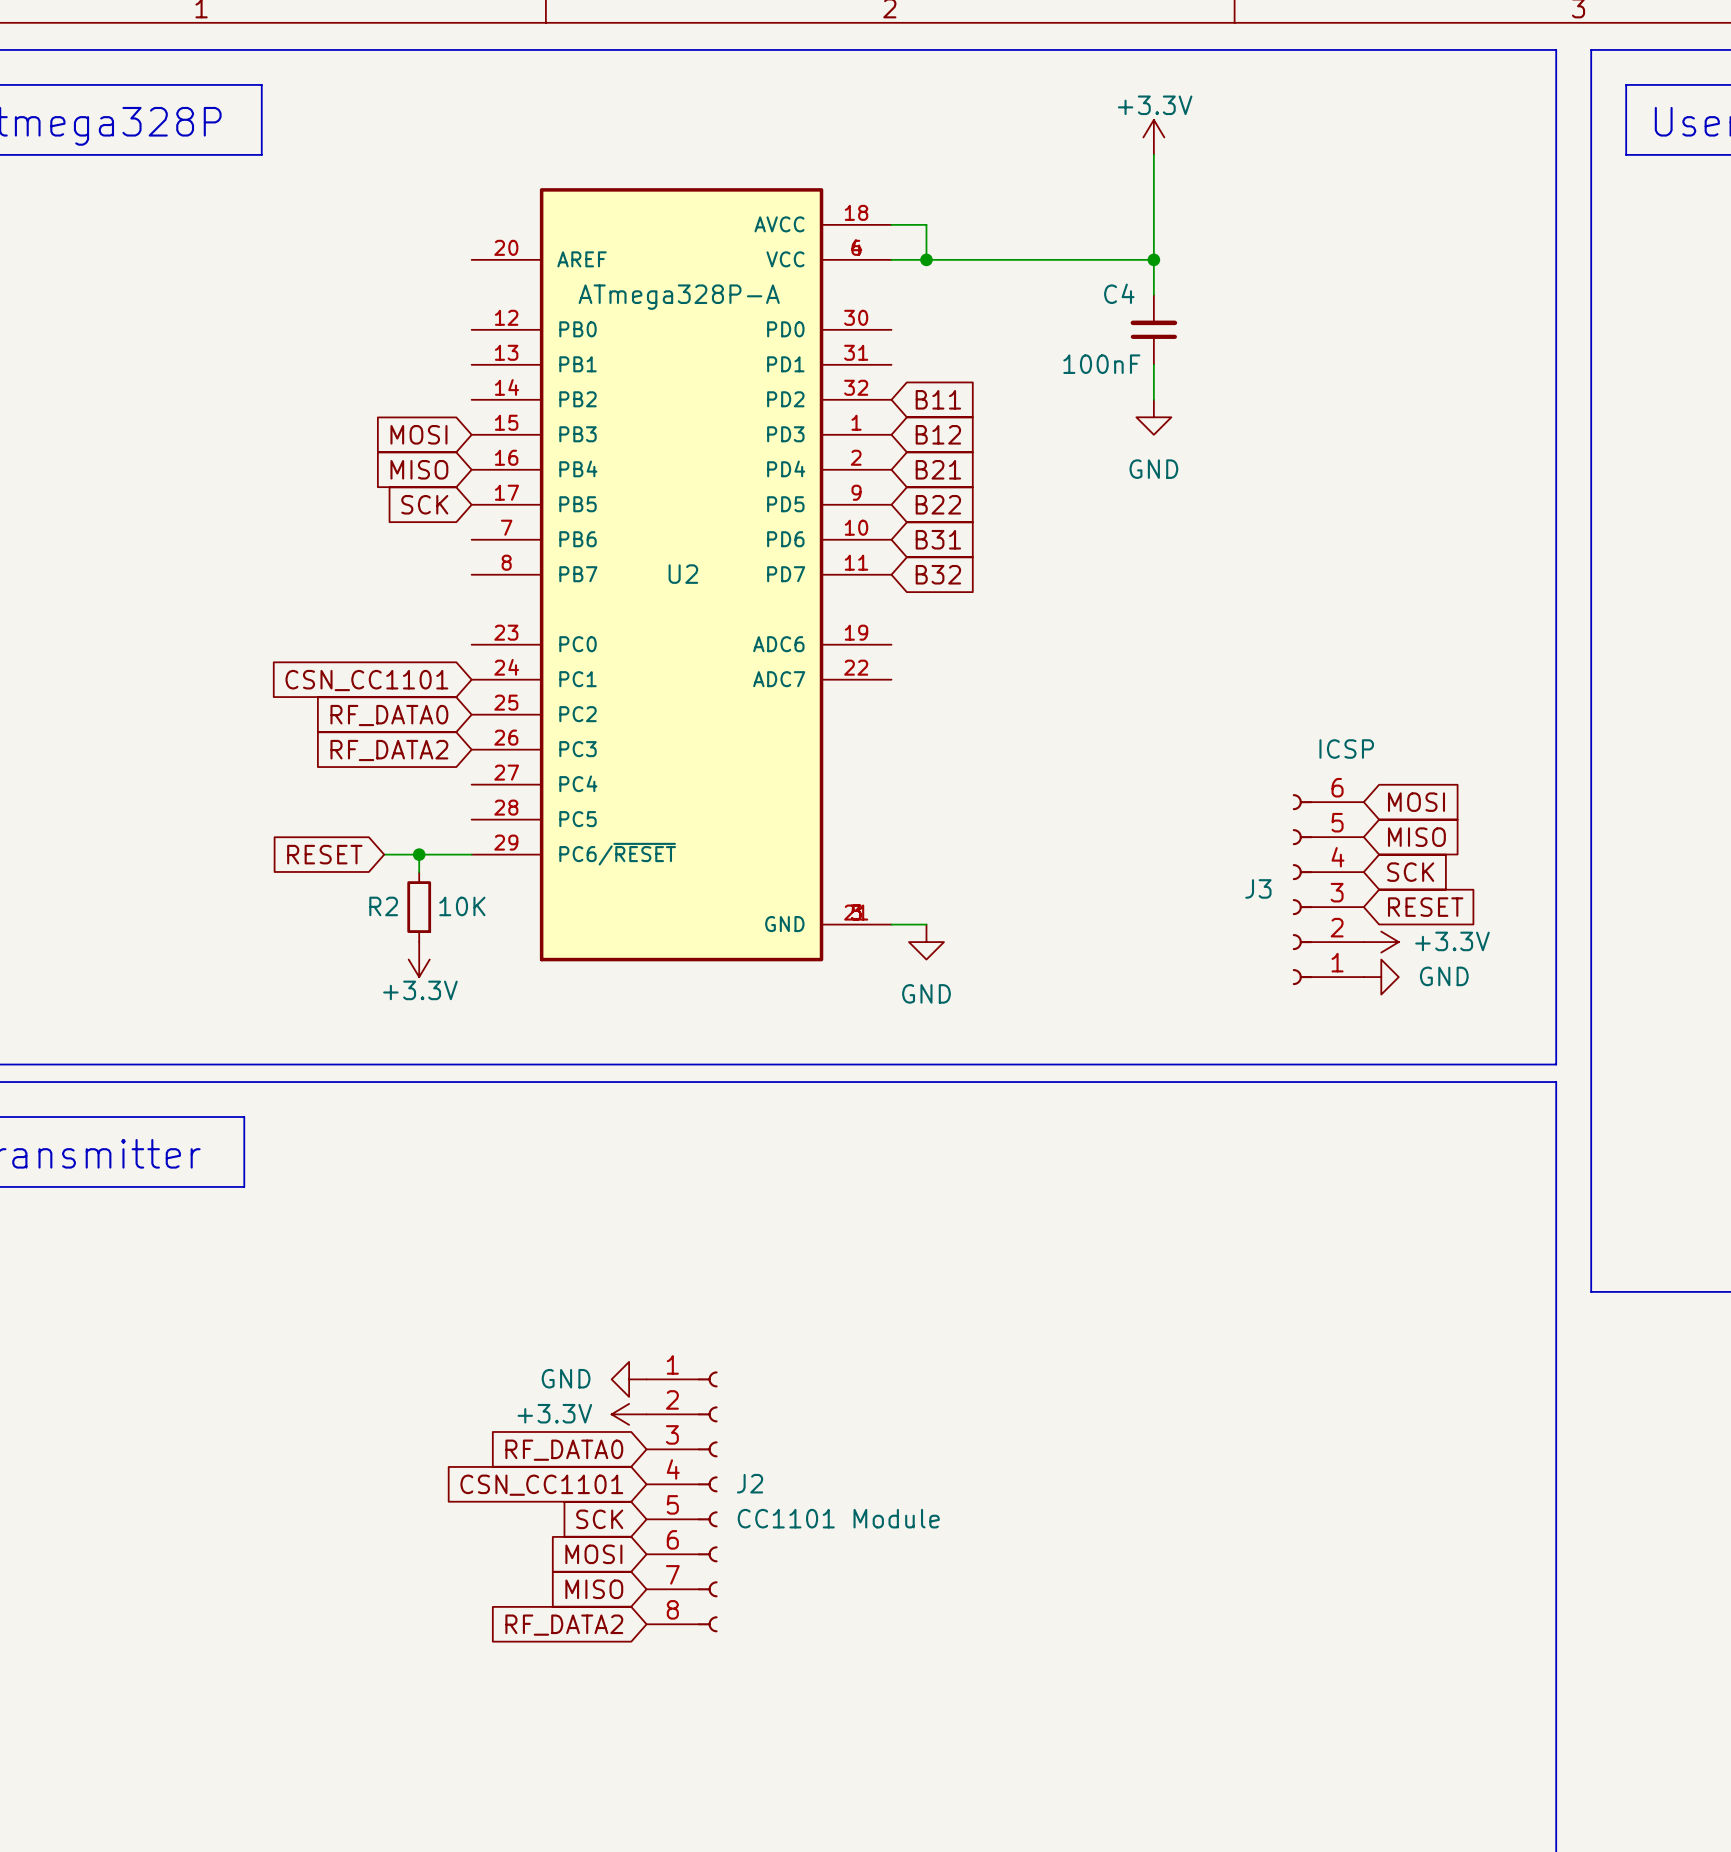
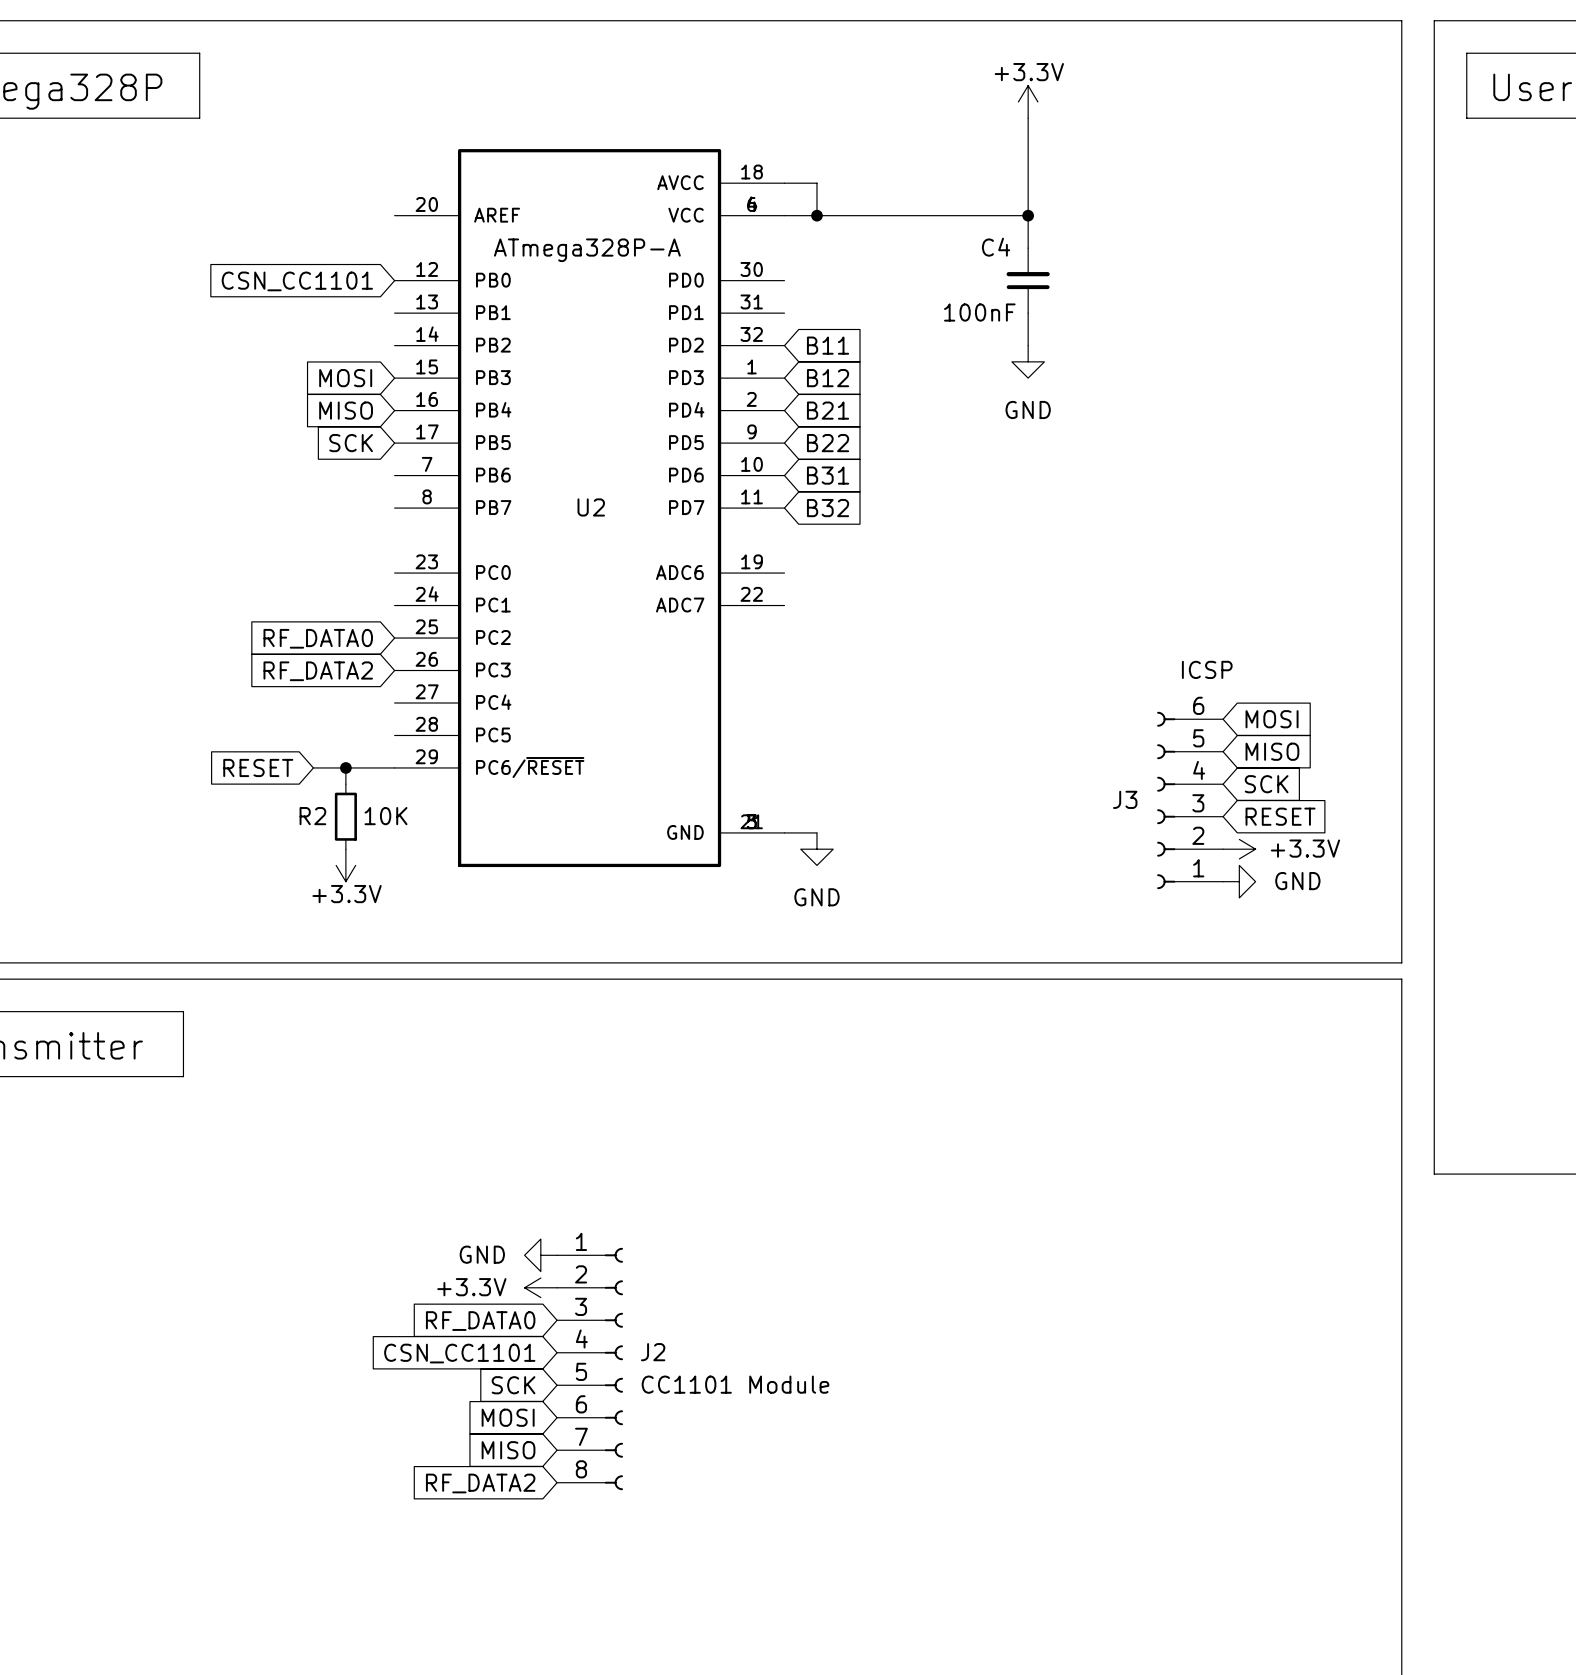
global label: none -> CSN_CC1101 (297, 281)
global label: CSN_CC1101 (366, 680) -> none

